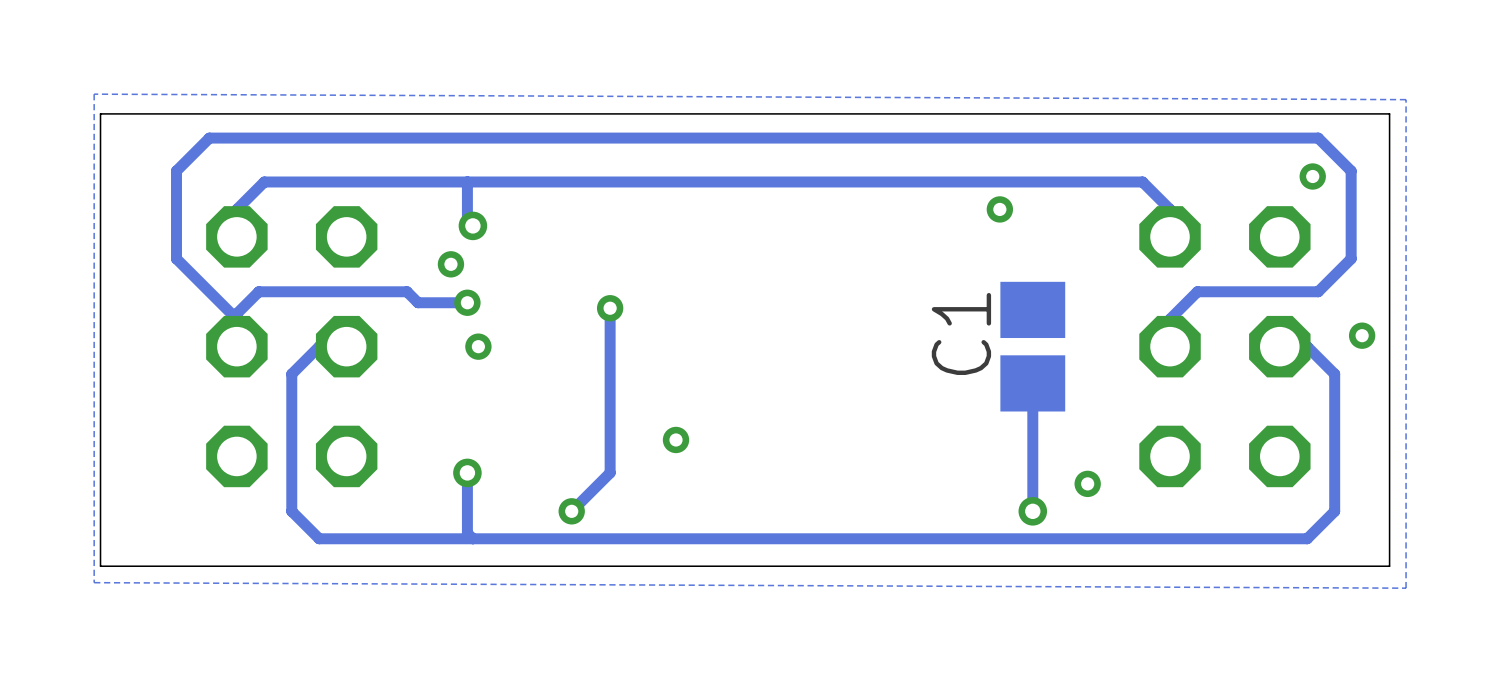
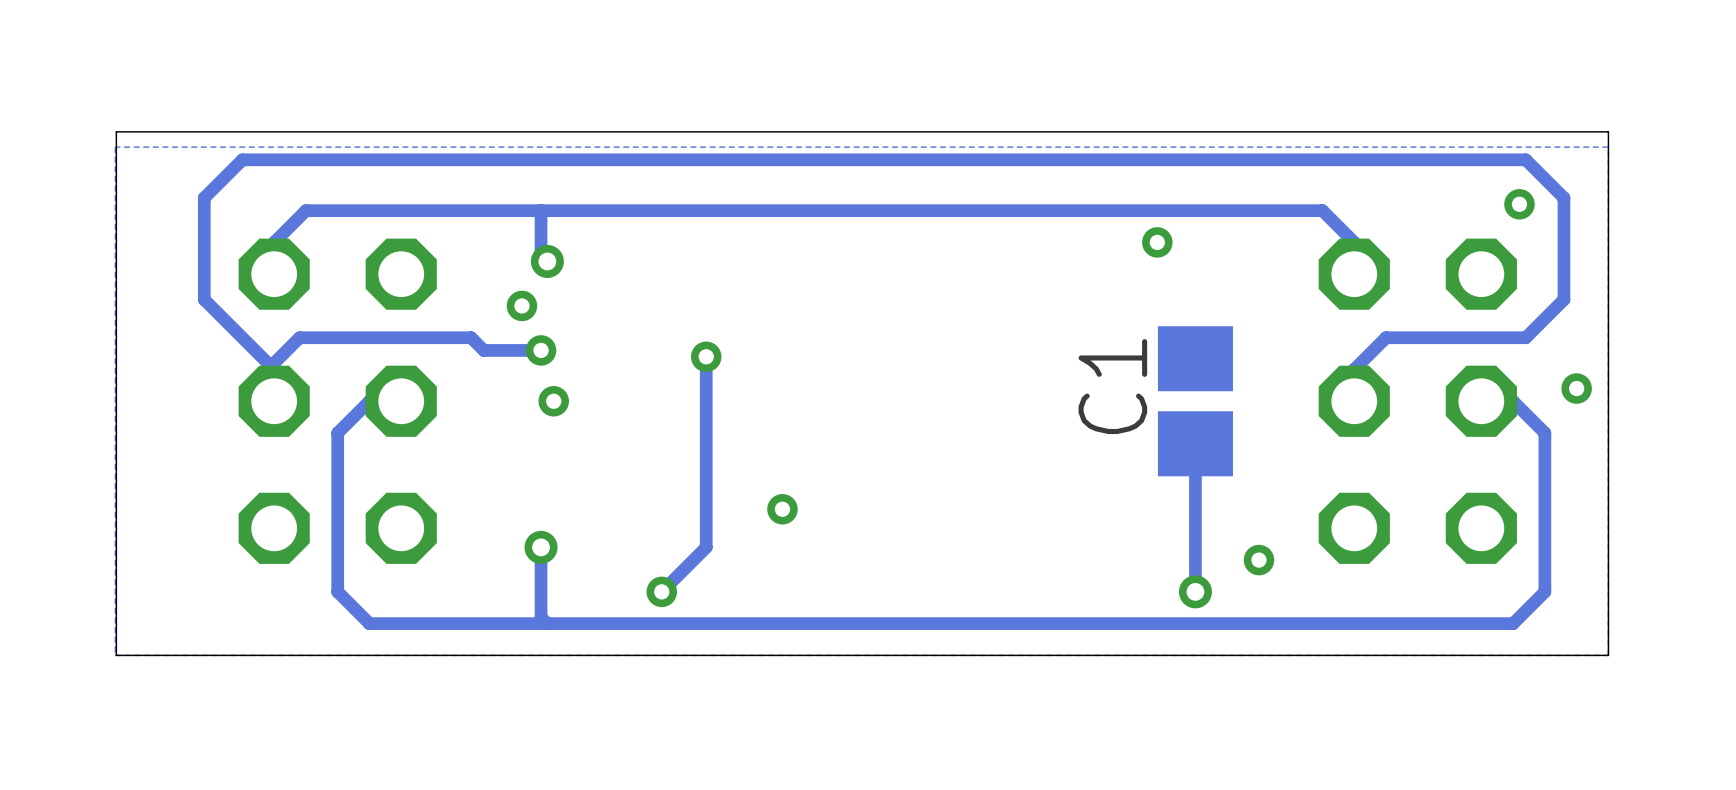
zone outline: (94, 94) (1406, 99) (1406, 588) (94, 582) (94, 94) -> (1608, 147) (1608, 655) (115, 655) (115, 147) (1608, 147)

